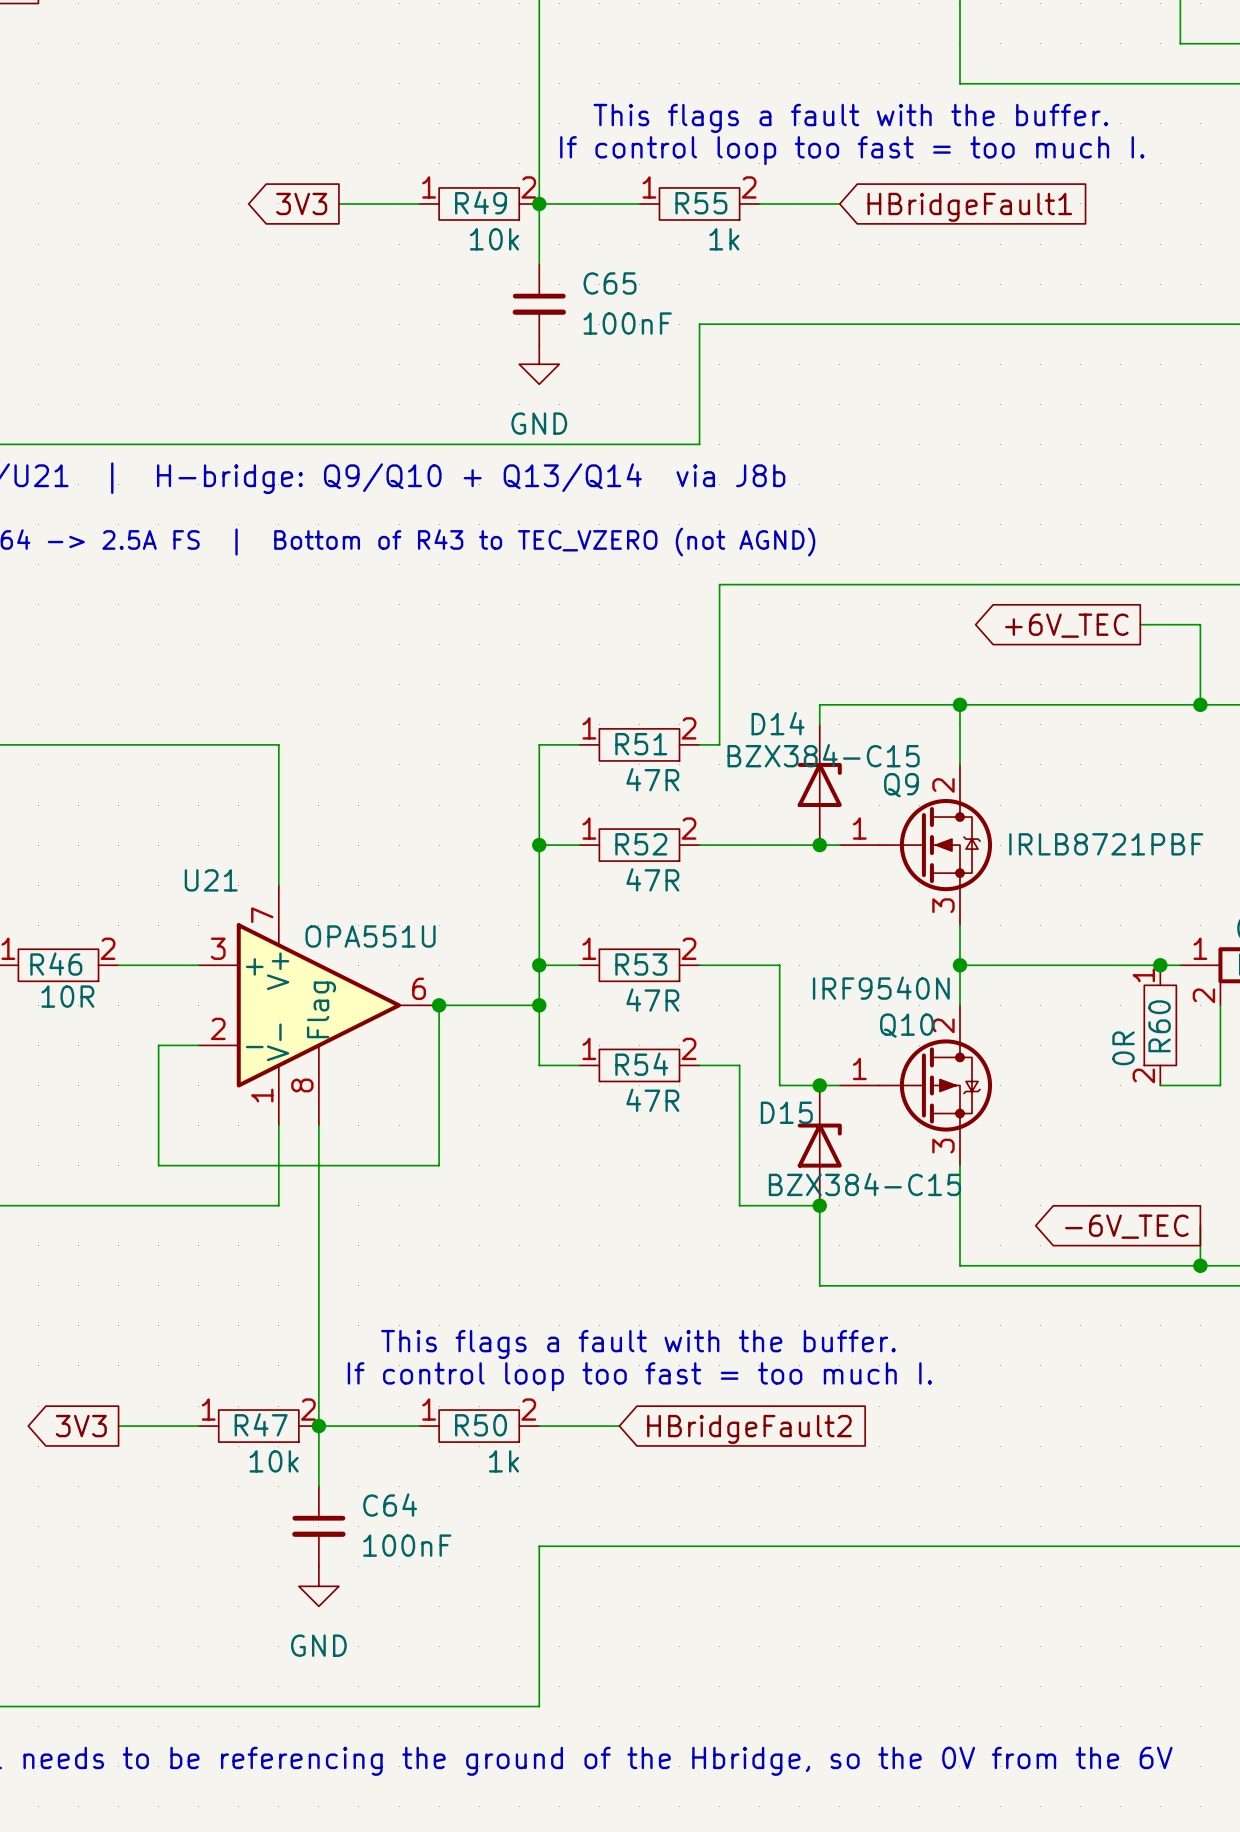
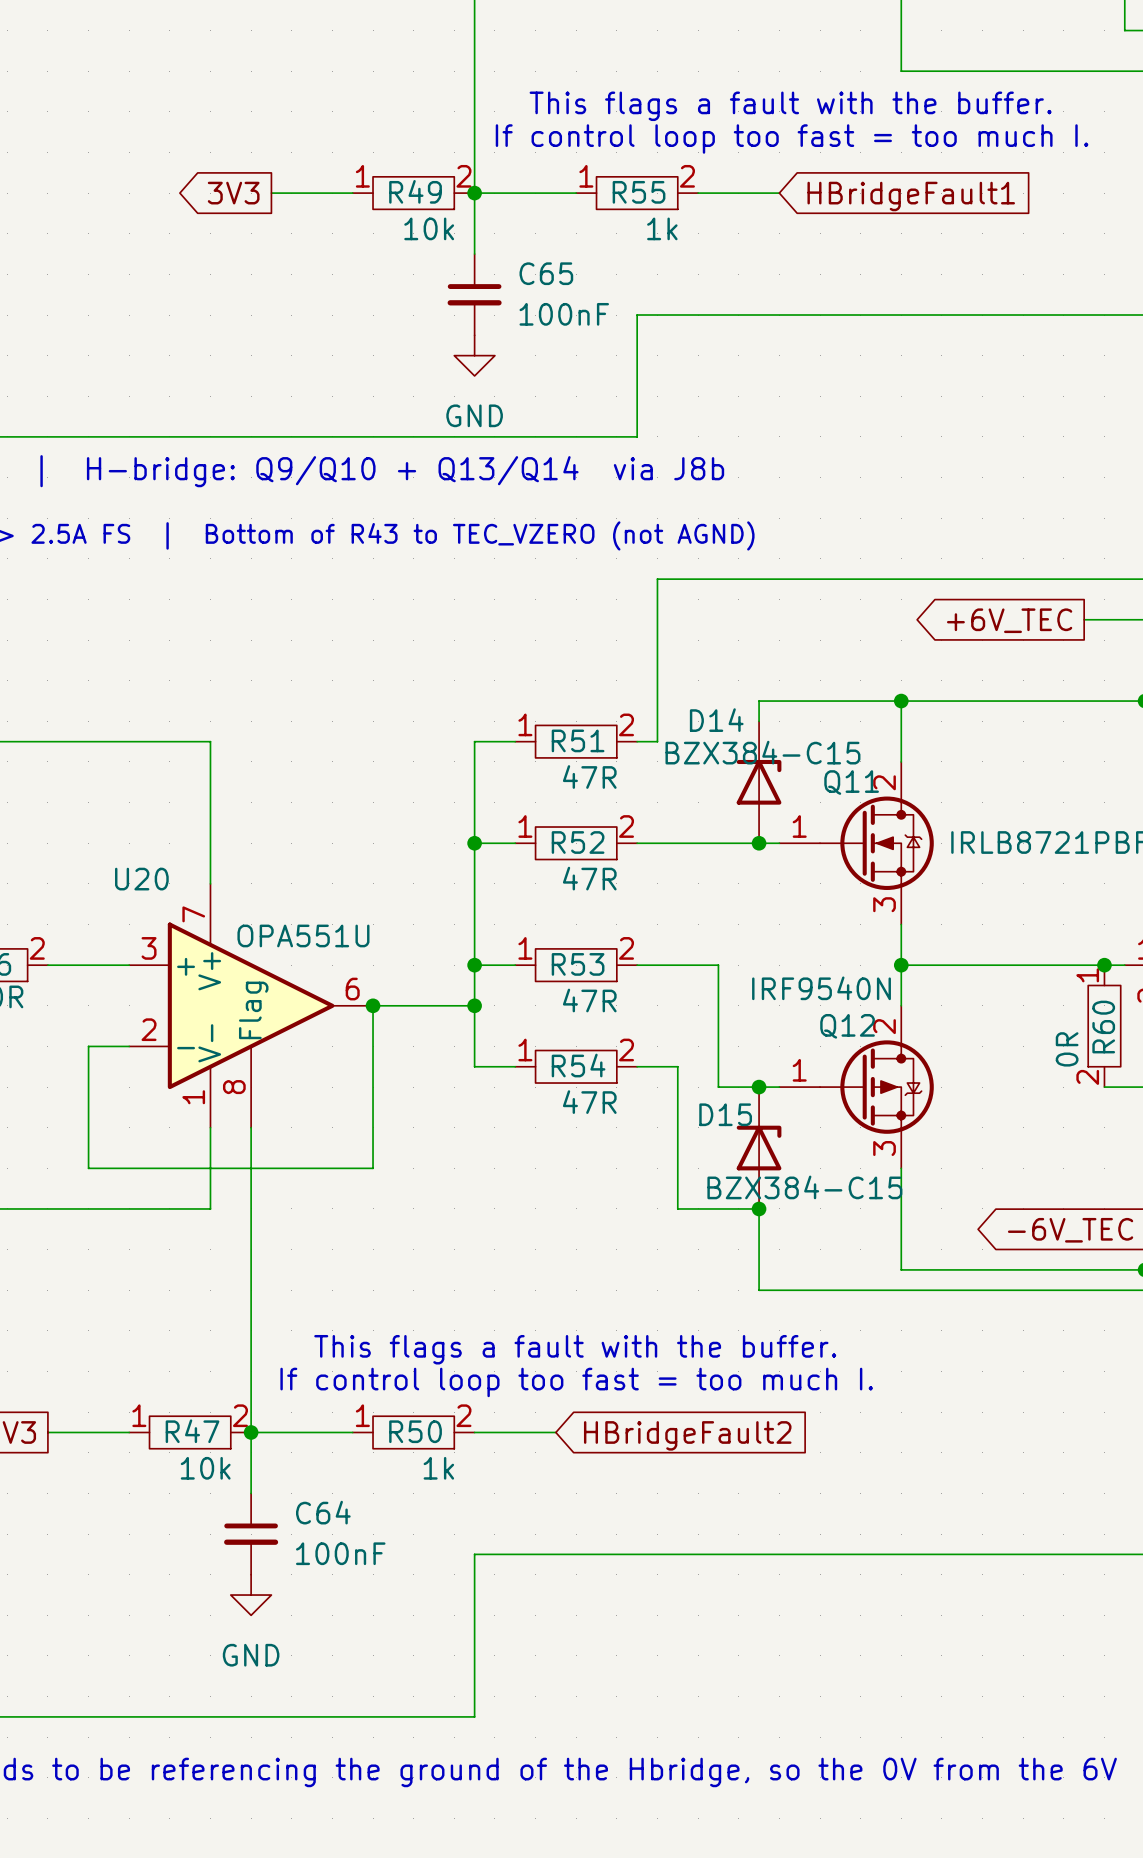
Q9 name: Q9 (901, 785) -> Q11 (851, 782)
U21 name: U21 (211, 880) -> U20 (141, 879)
Q10 name: Q10 (907, 1025) -> Q12 (847, 1026)

